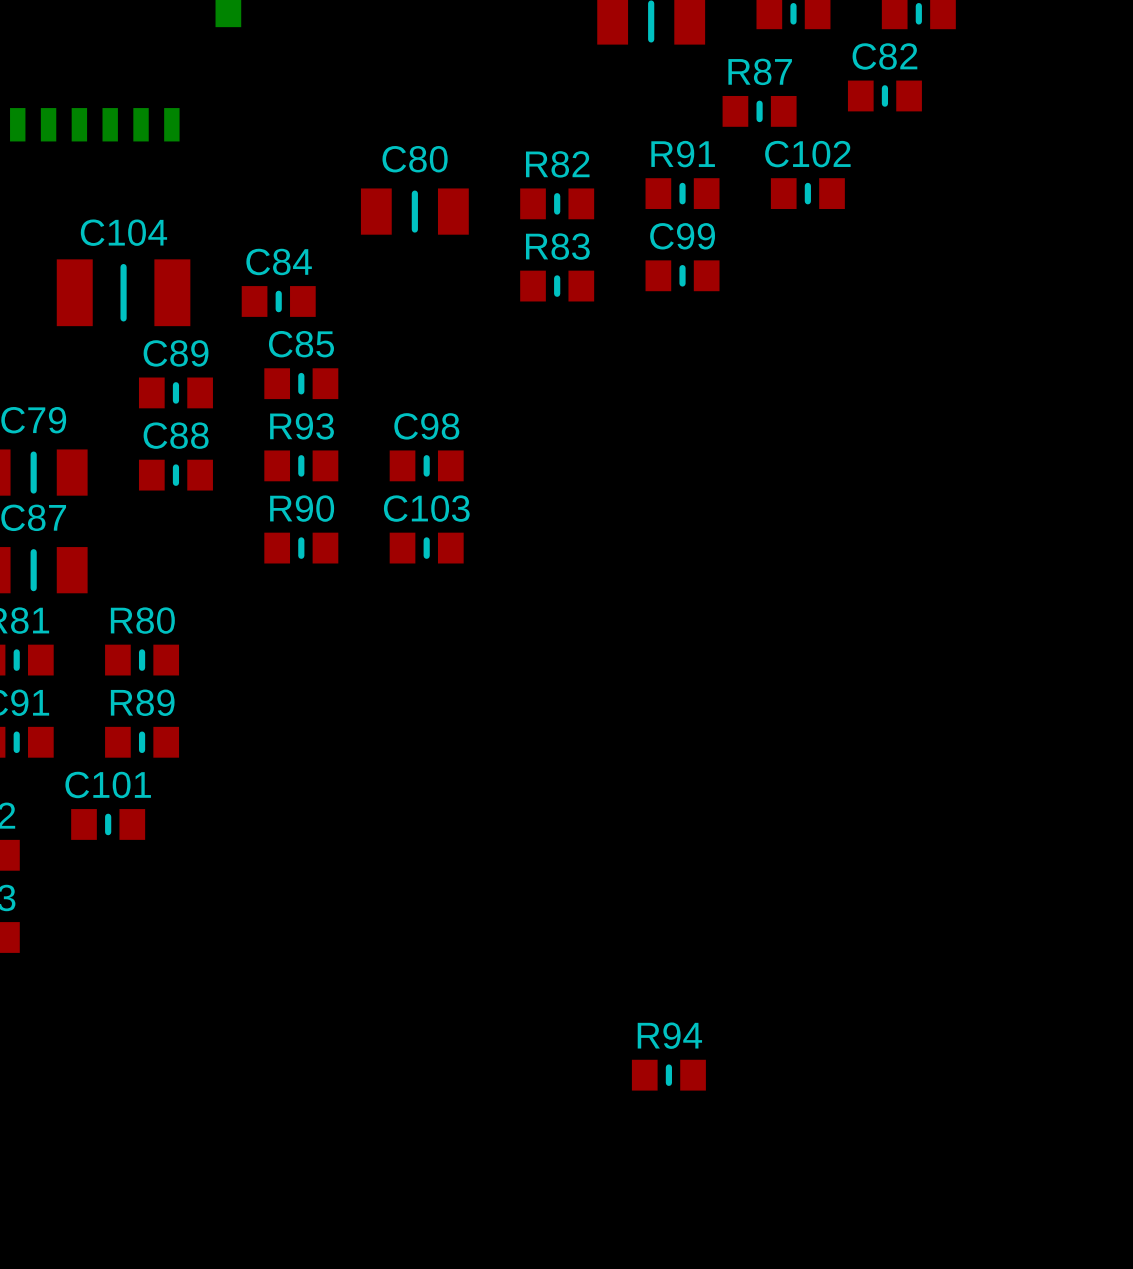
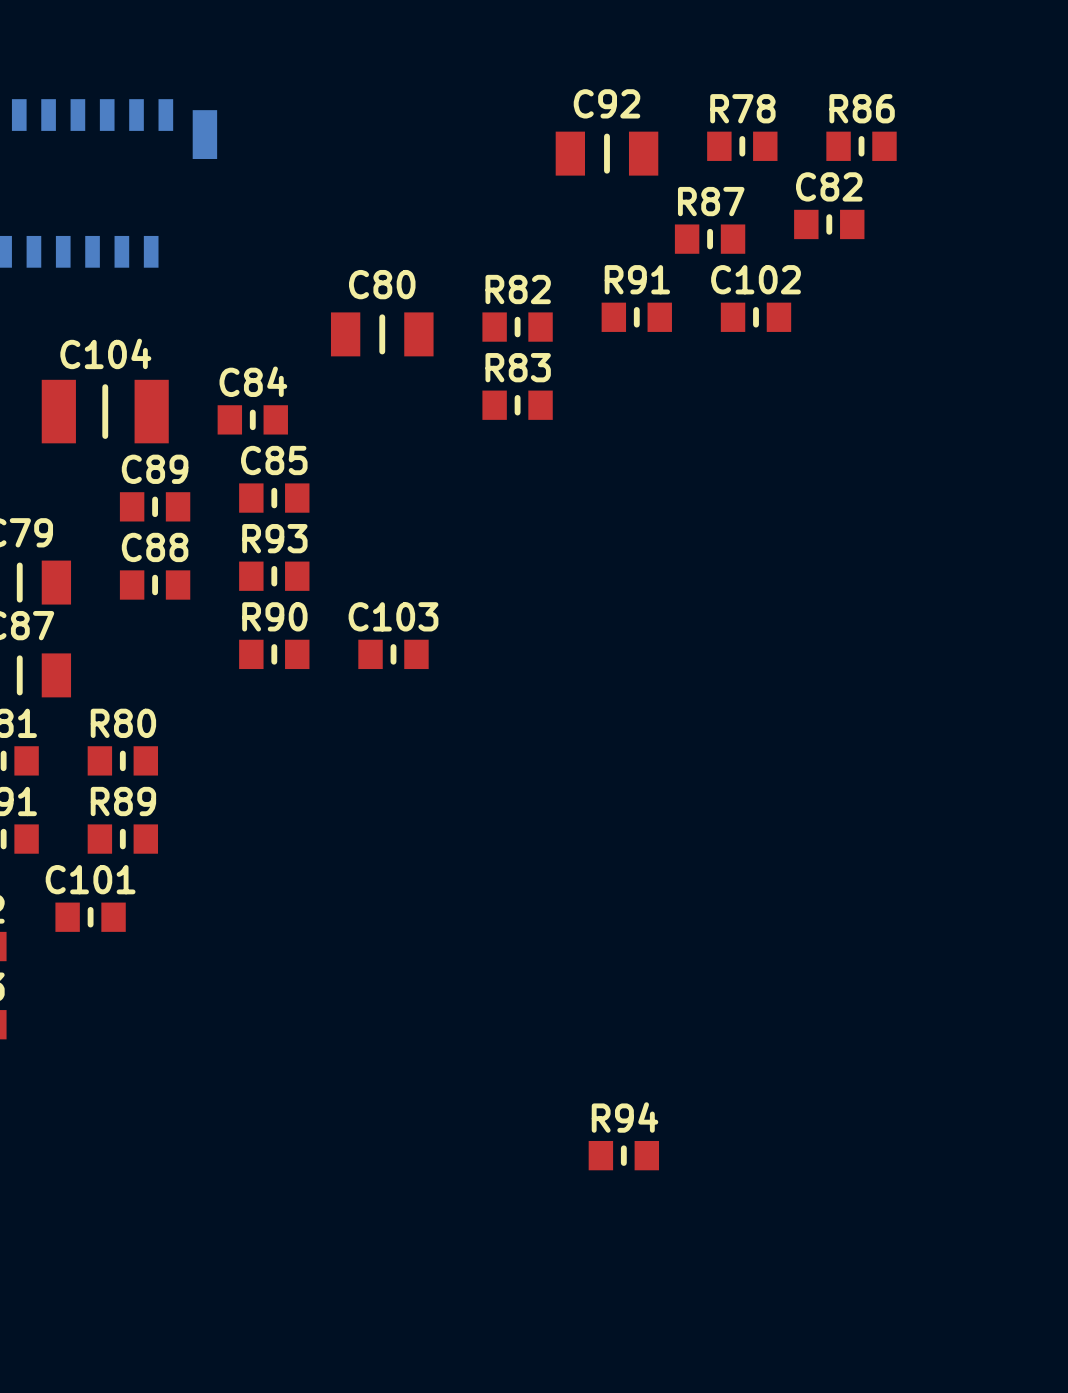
C99: (682, 275) -> none
C98: (426, 465) -> none

